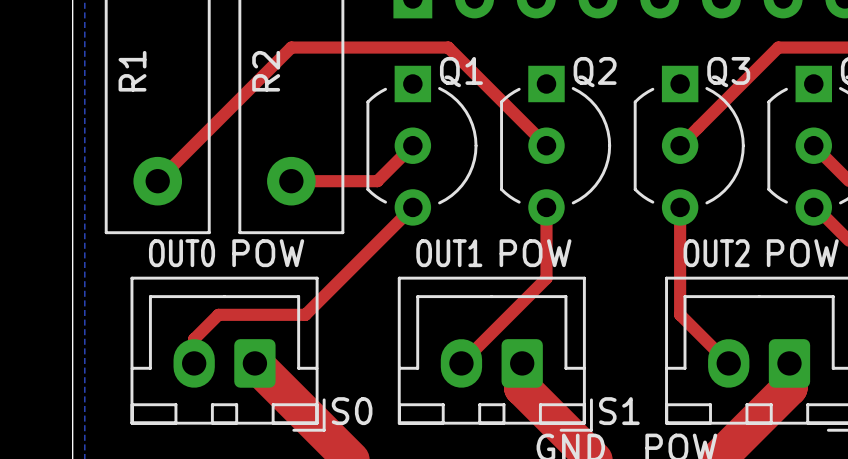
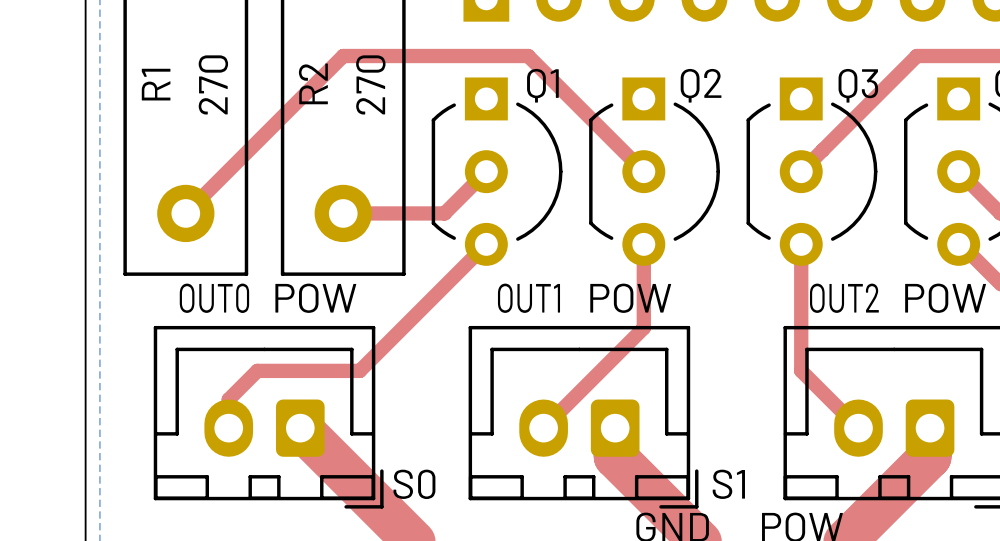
R1 value: none -> 270 (213, 84)
R2 value: none -> 270 (370, 84)

